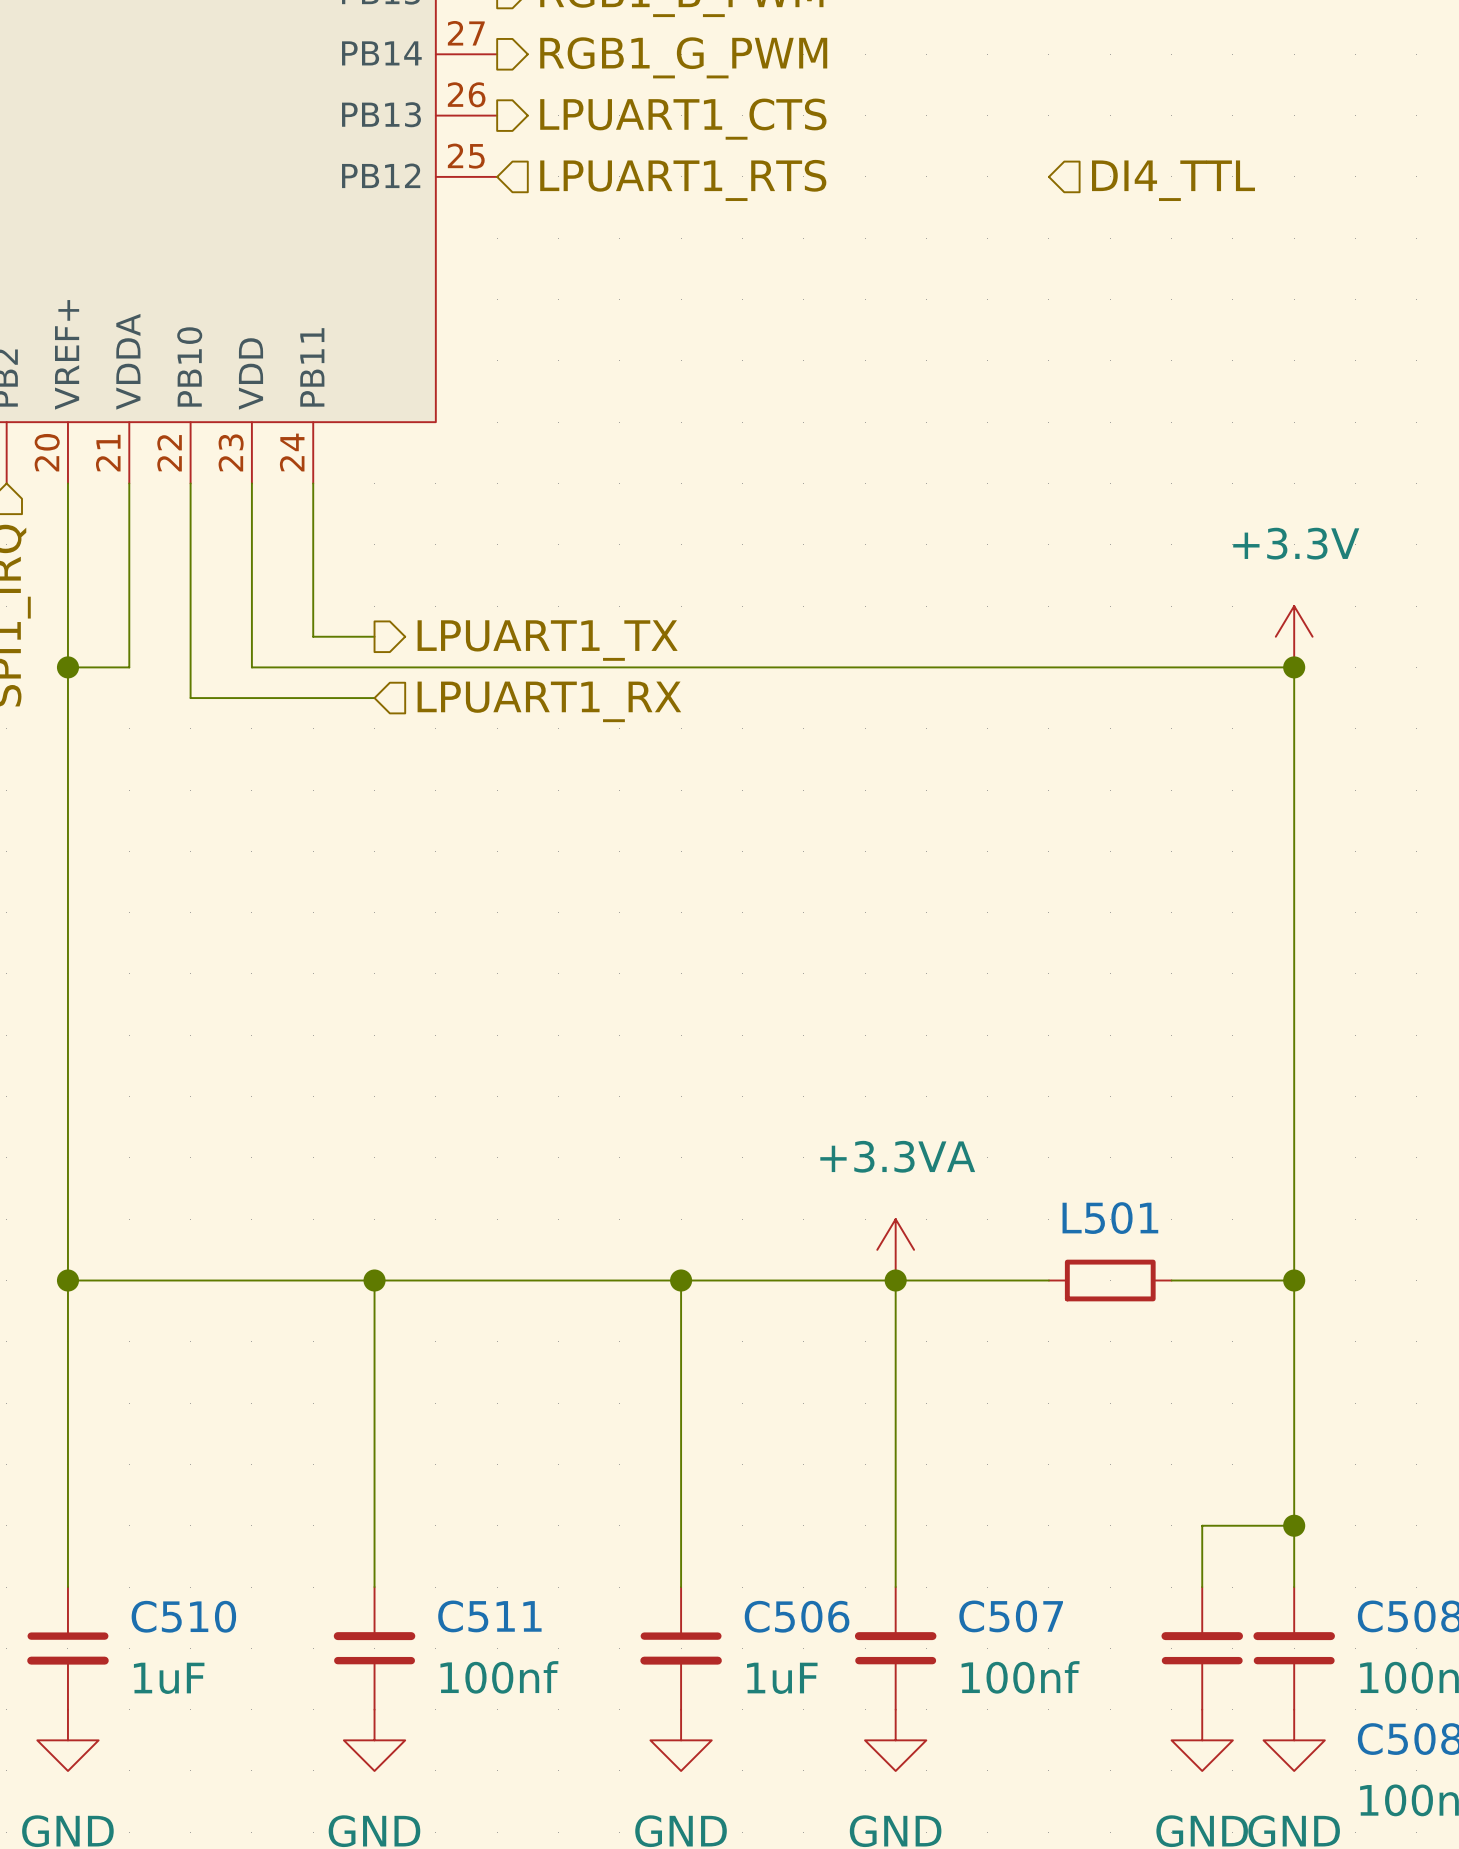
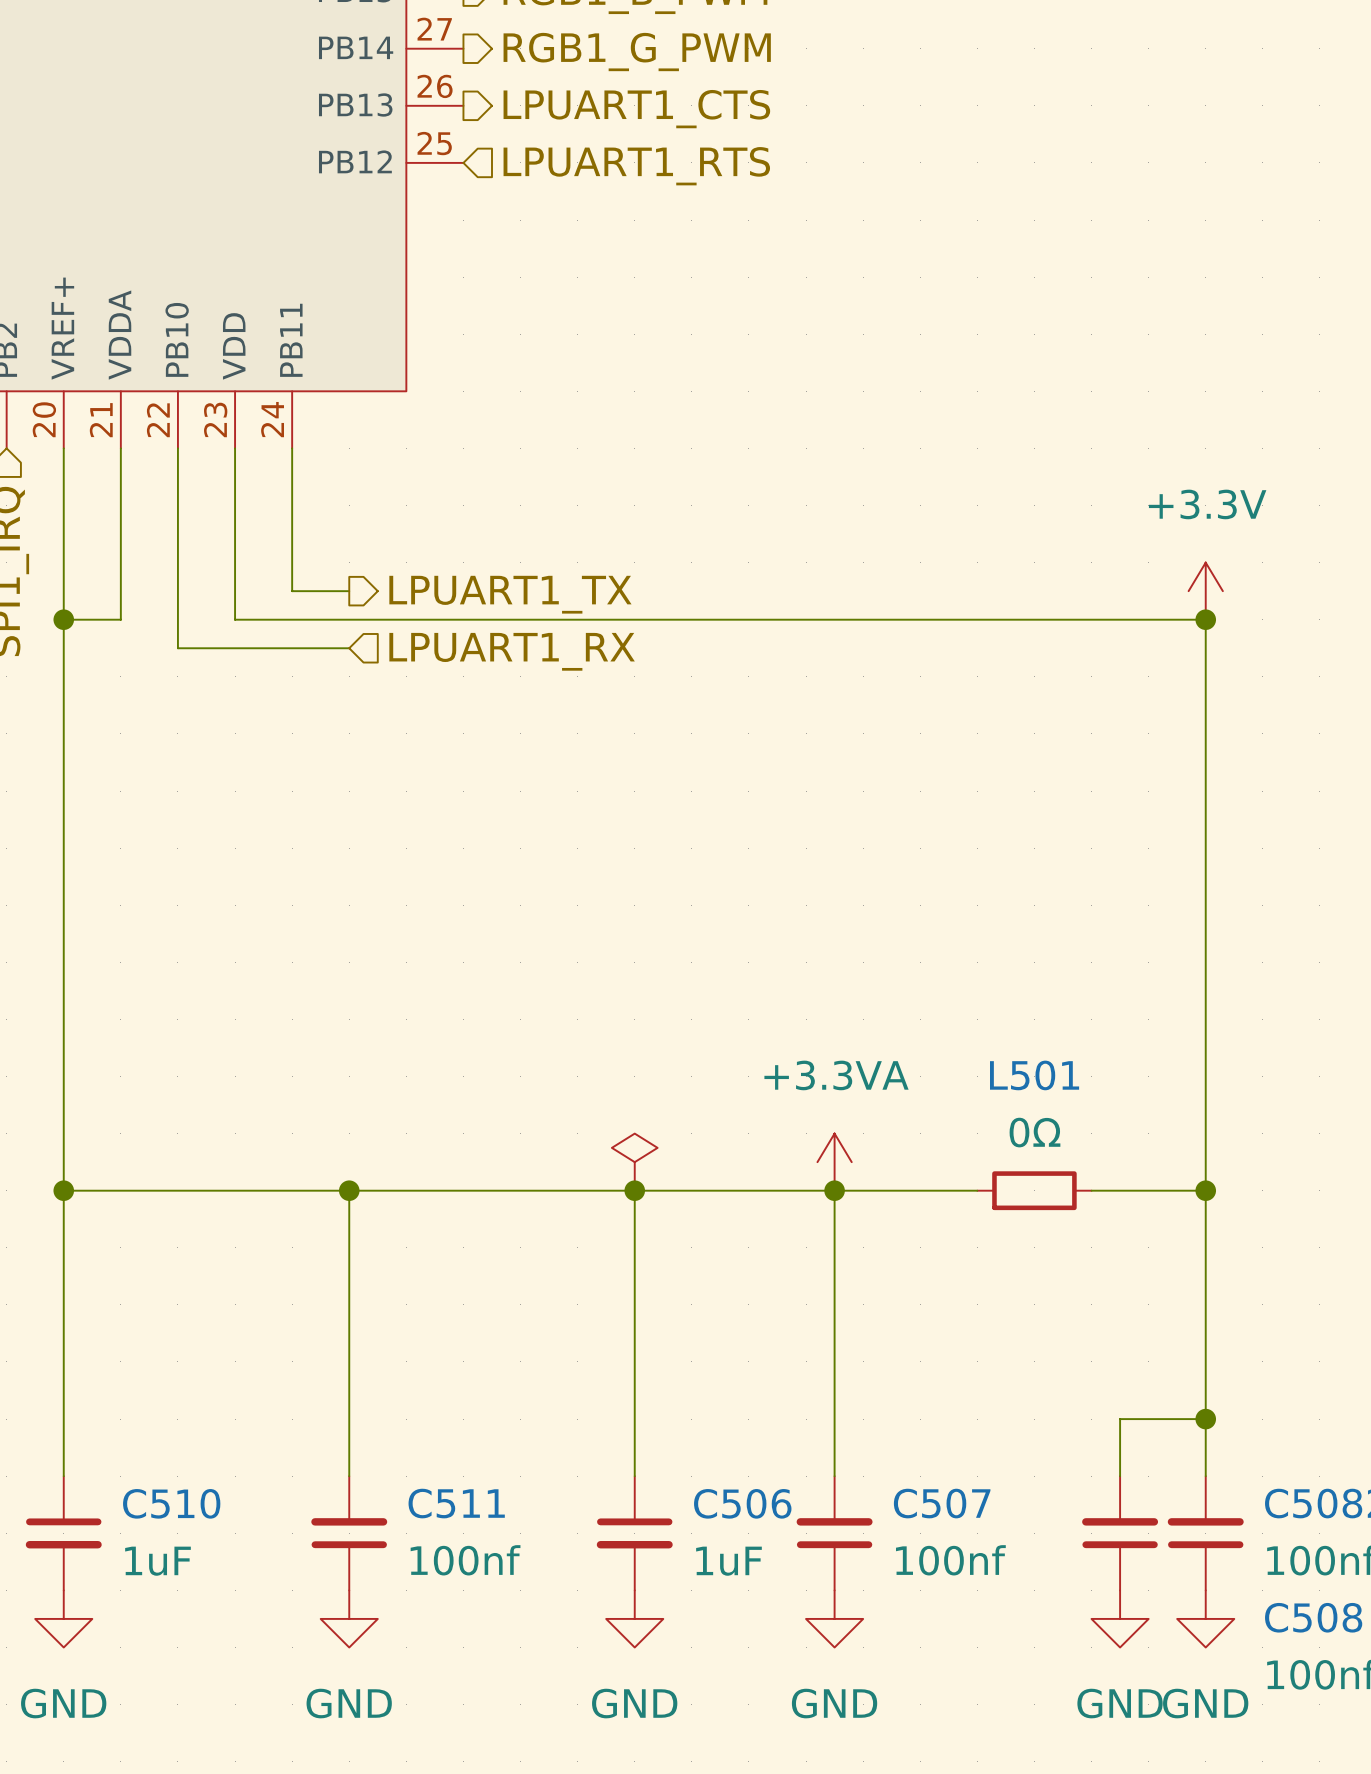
hierarchical label: DI4_TTL (1173, 180) -> none
L501 text: none -> 0Ω (1034, 1132)
L501 name position: L501 (1110, 1218) -> L501 (1034, 1075)
power symbol: none -> (634, 1162)

